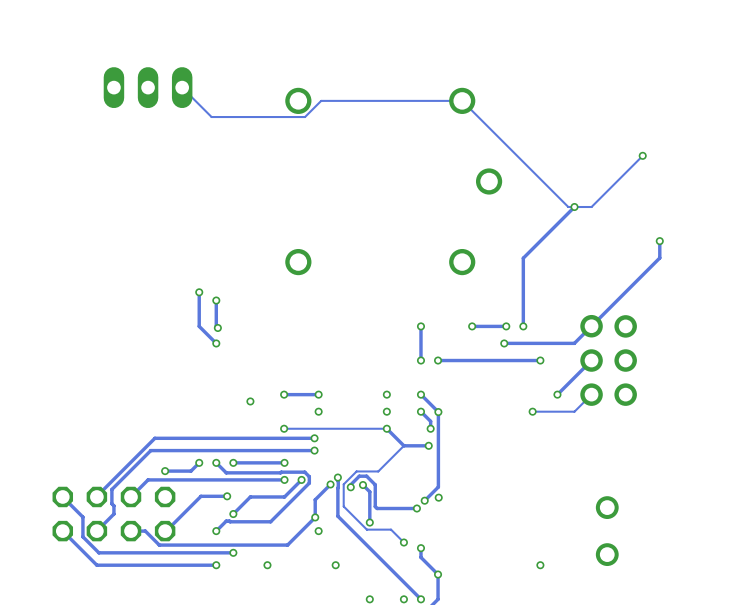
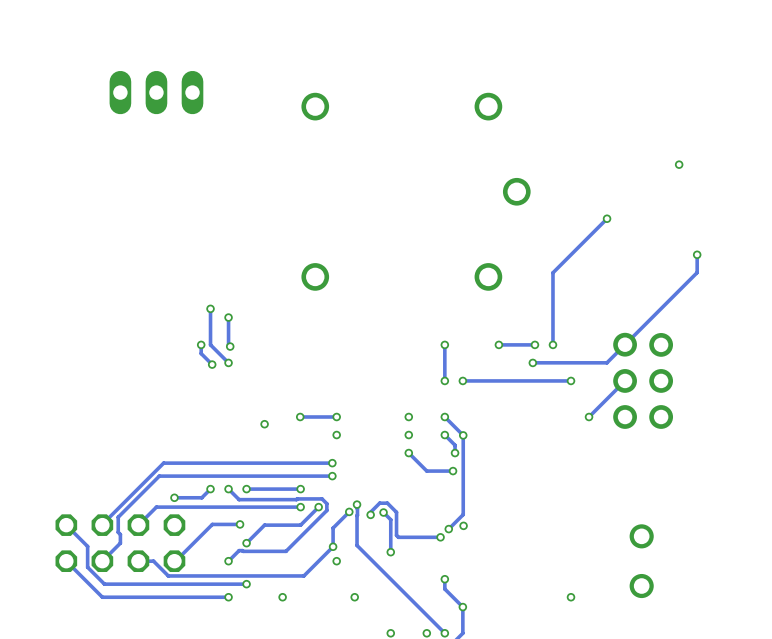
track: (182, 87) (211, 117) (305, 117) (321, 100) (462, 100) (568, 207) (591, 207) (642, 155) -> none
track: none -> (201, 344) (201, 353) (212, 364)
via: none -> (201, 344)
via: none -> (212, 364)
track: (591, 394) (574, 411) (532, 411) -> none
via: (532, 411) -> none
via: (284, 428) -> none
track: (386, 428) (284, 428) -> none
track: (403, 445) (378, 471) (356, 471) (343, 484) (343, 506) (366, 529) (391, 529) (403, 542) -> none
via: (403, 542) -> none

